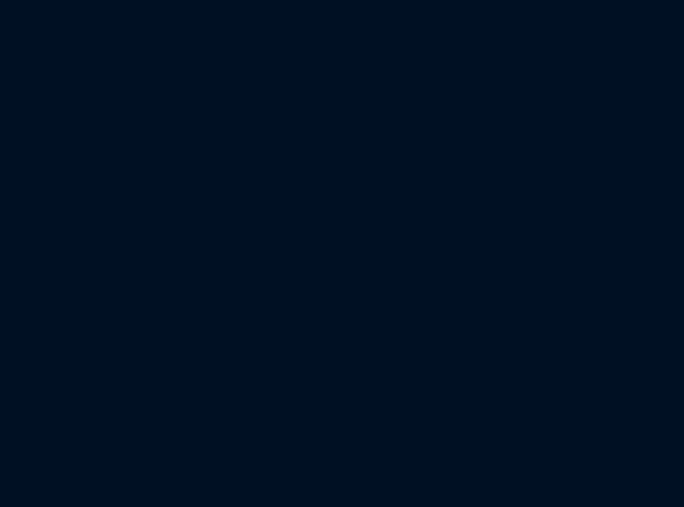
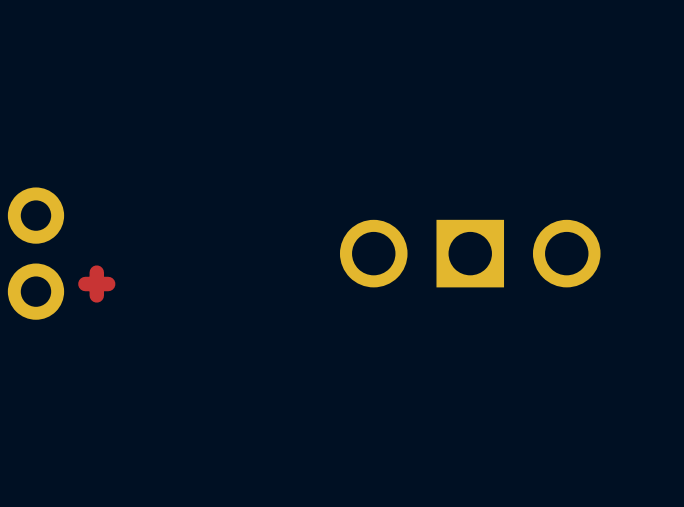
part: none -> (61, 253)
part: none -> (470, 253)

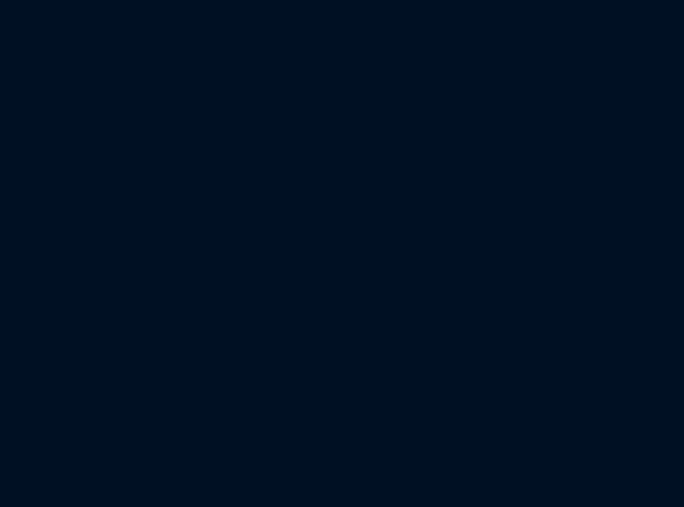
part: (61, 253) -> none
part: (470, 253) -> none

